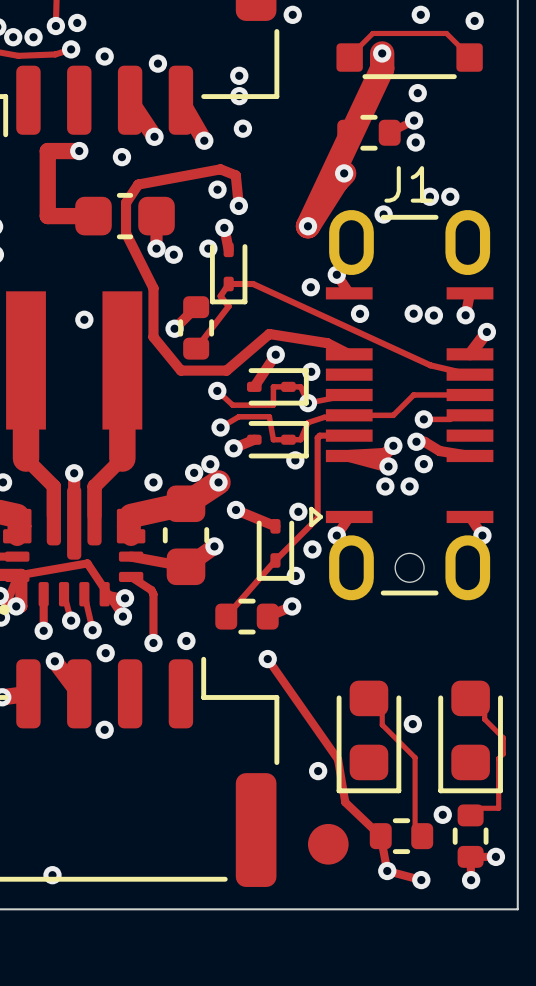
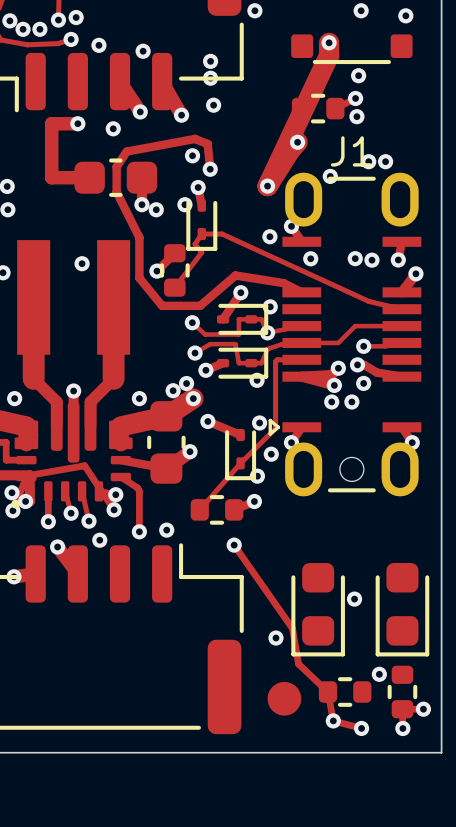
track: (359, 46) (372, 33) (446, 33) (464, 51) -> none
track: (382, 712) (382, 724) (415, 757) (415, 827) -> none
track: (484, 712) (484, 719) (503, 737) (503, 753) (498, 758) (498, 808) (479, 808) -> none
via: (104, 729) -> none
via: (52, 875) -> none

